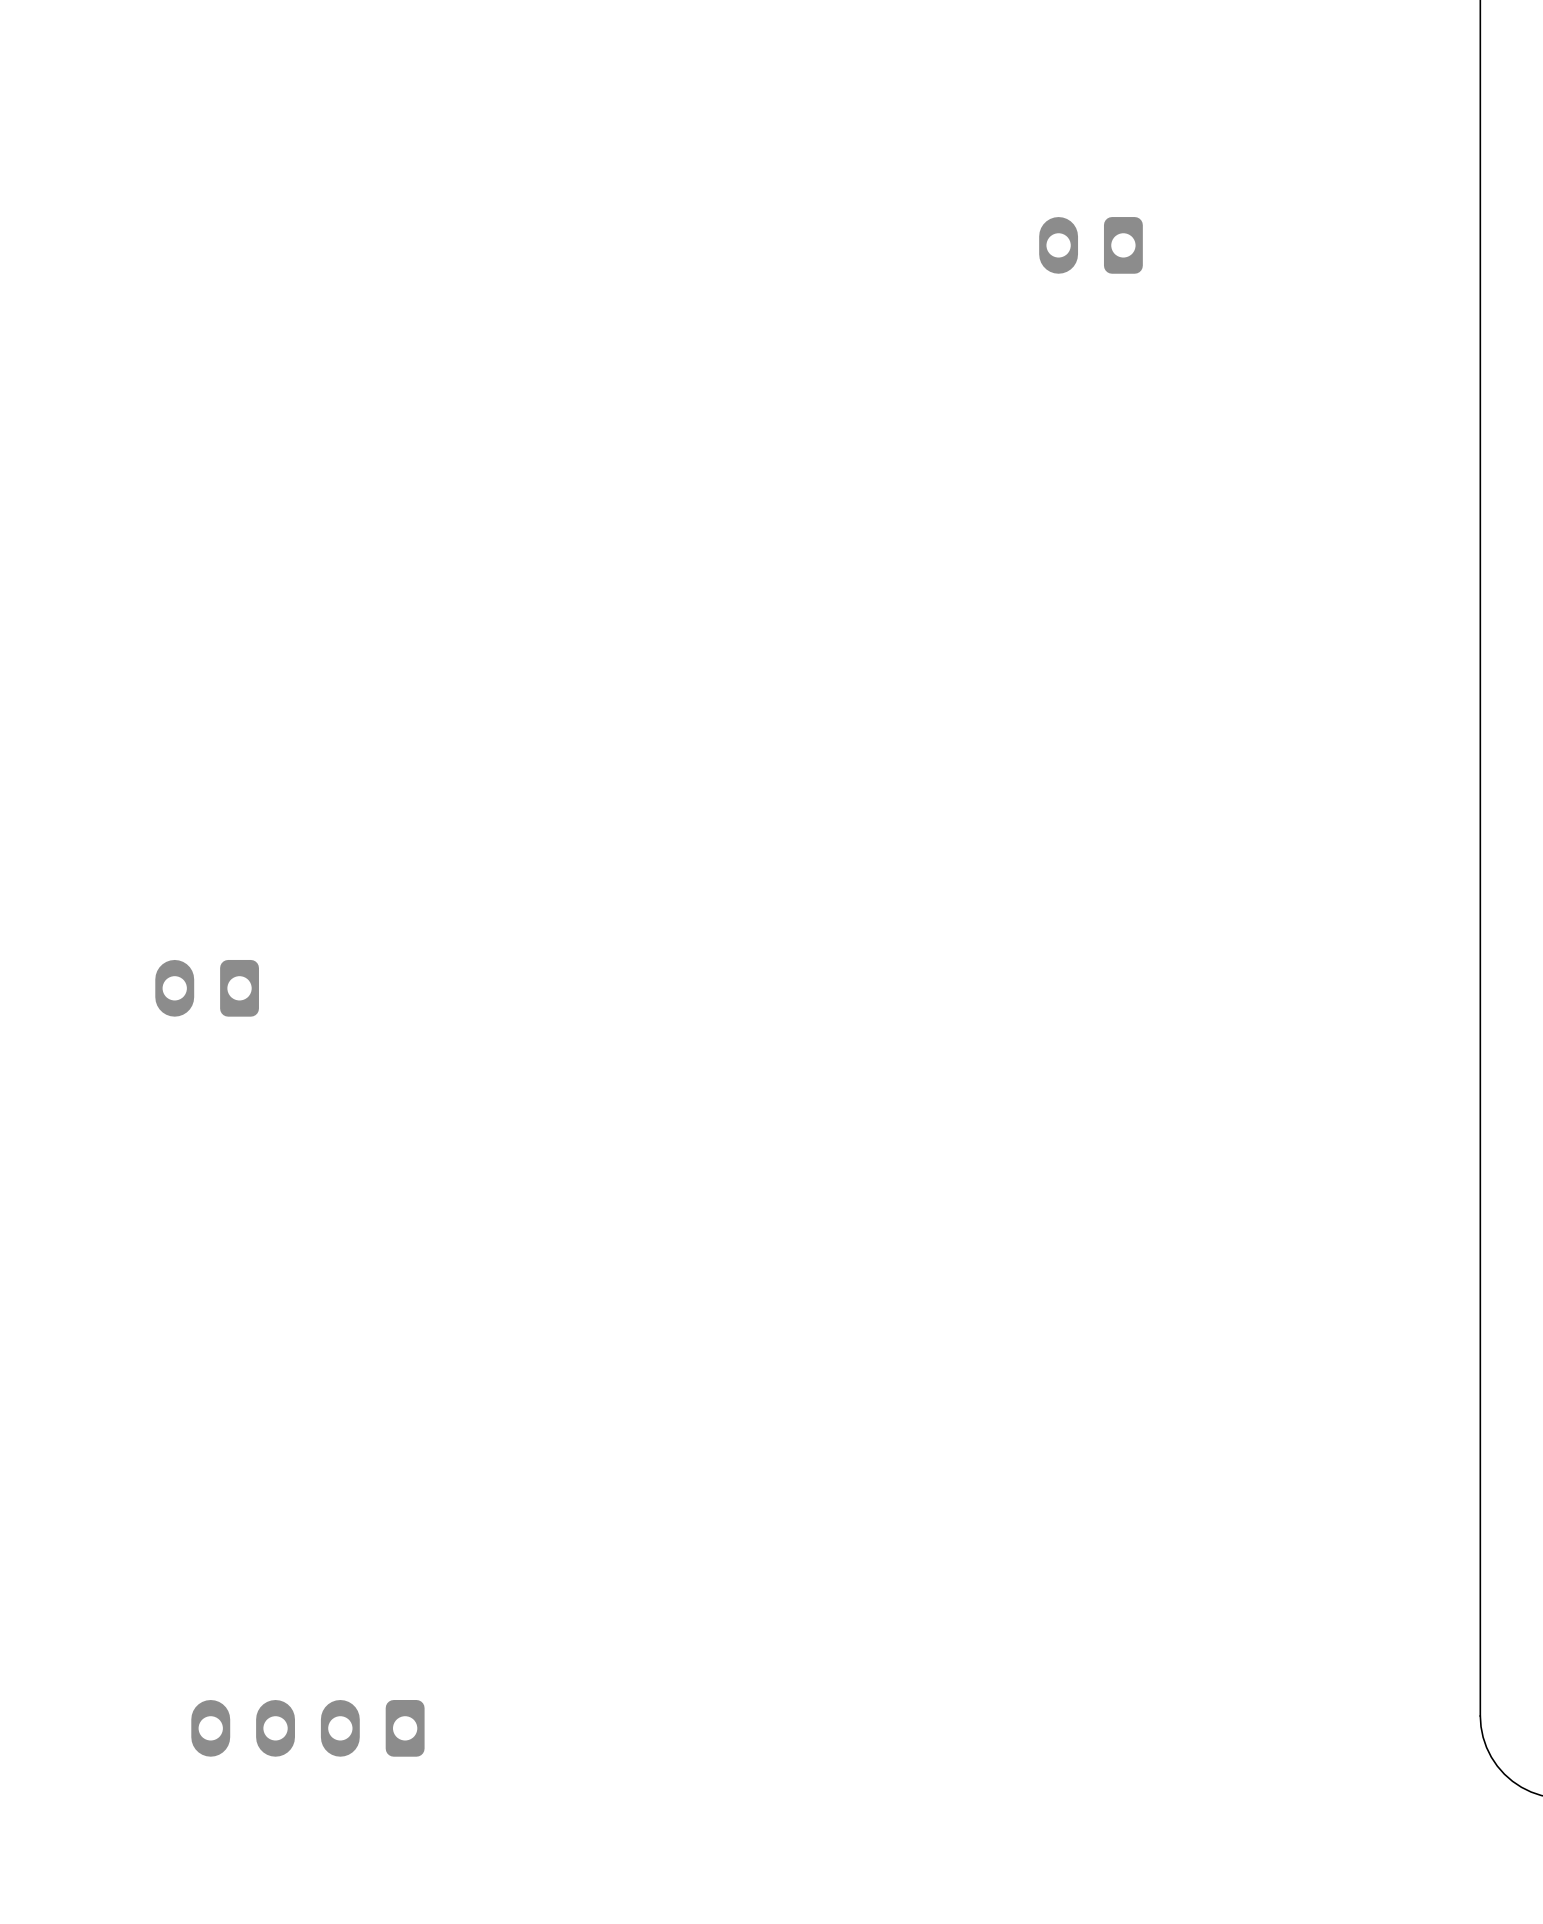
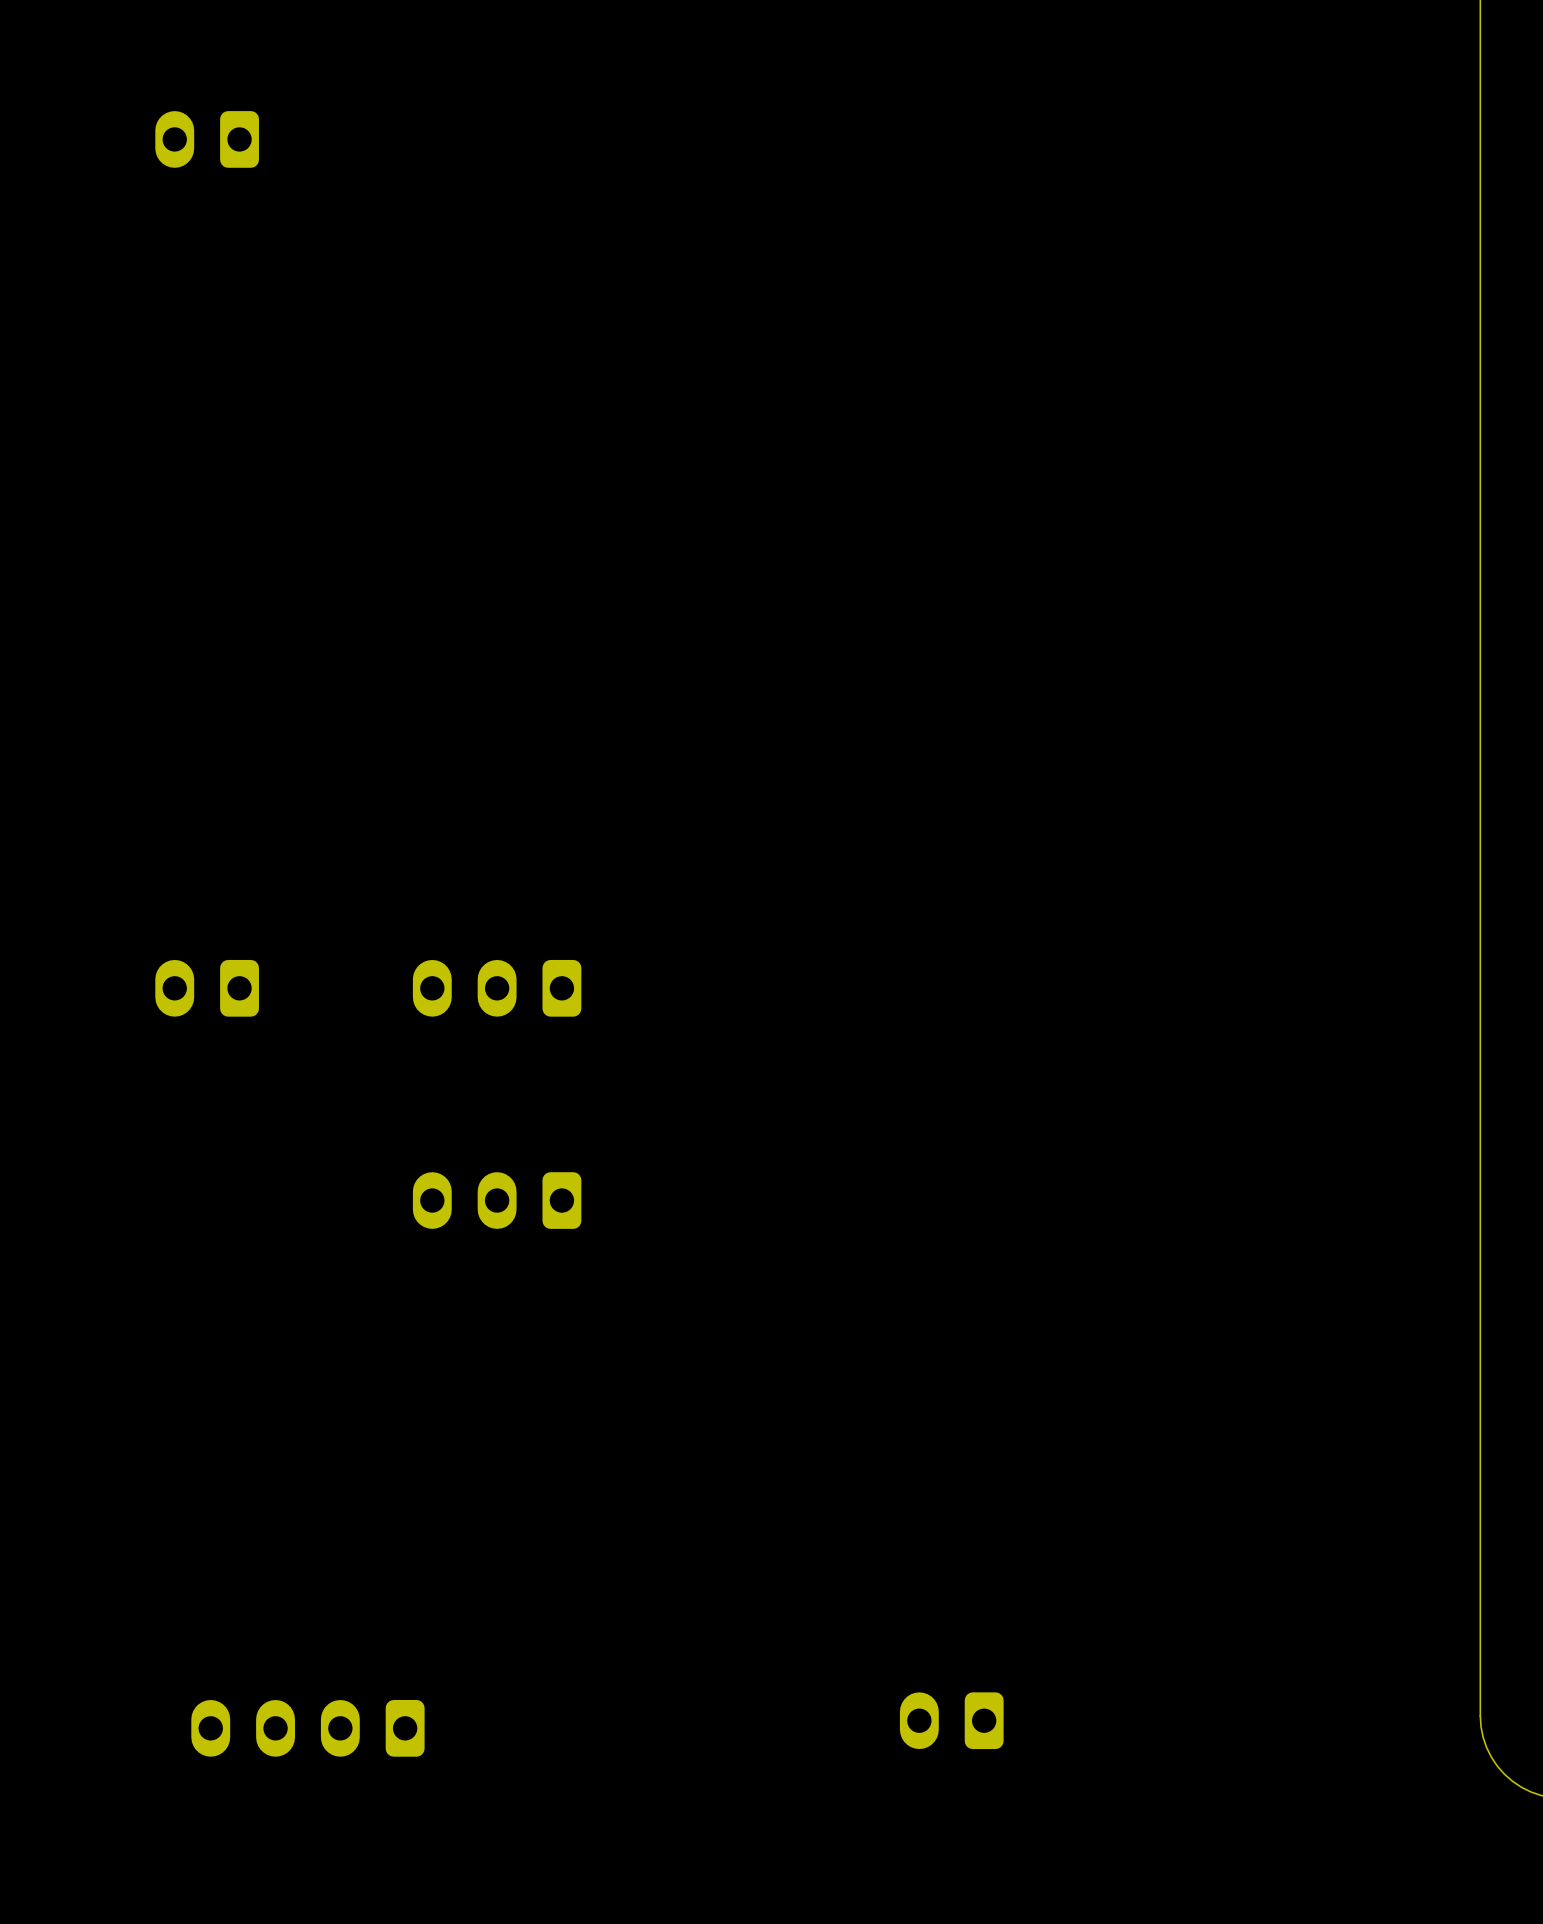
part: none -> (207, 139)
part: (1091, 245) -> none
part: none -> (497, 988)
part: none -> (497, 1200)
part: none -> (951, 1720)

